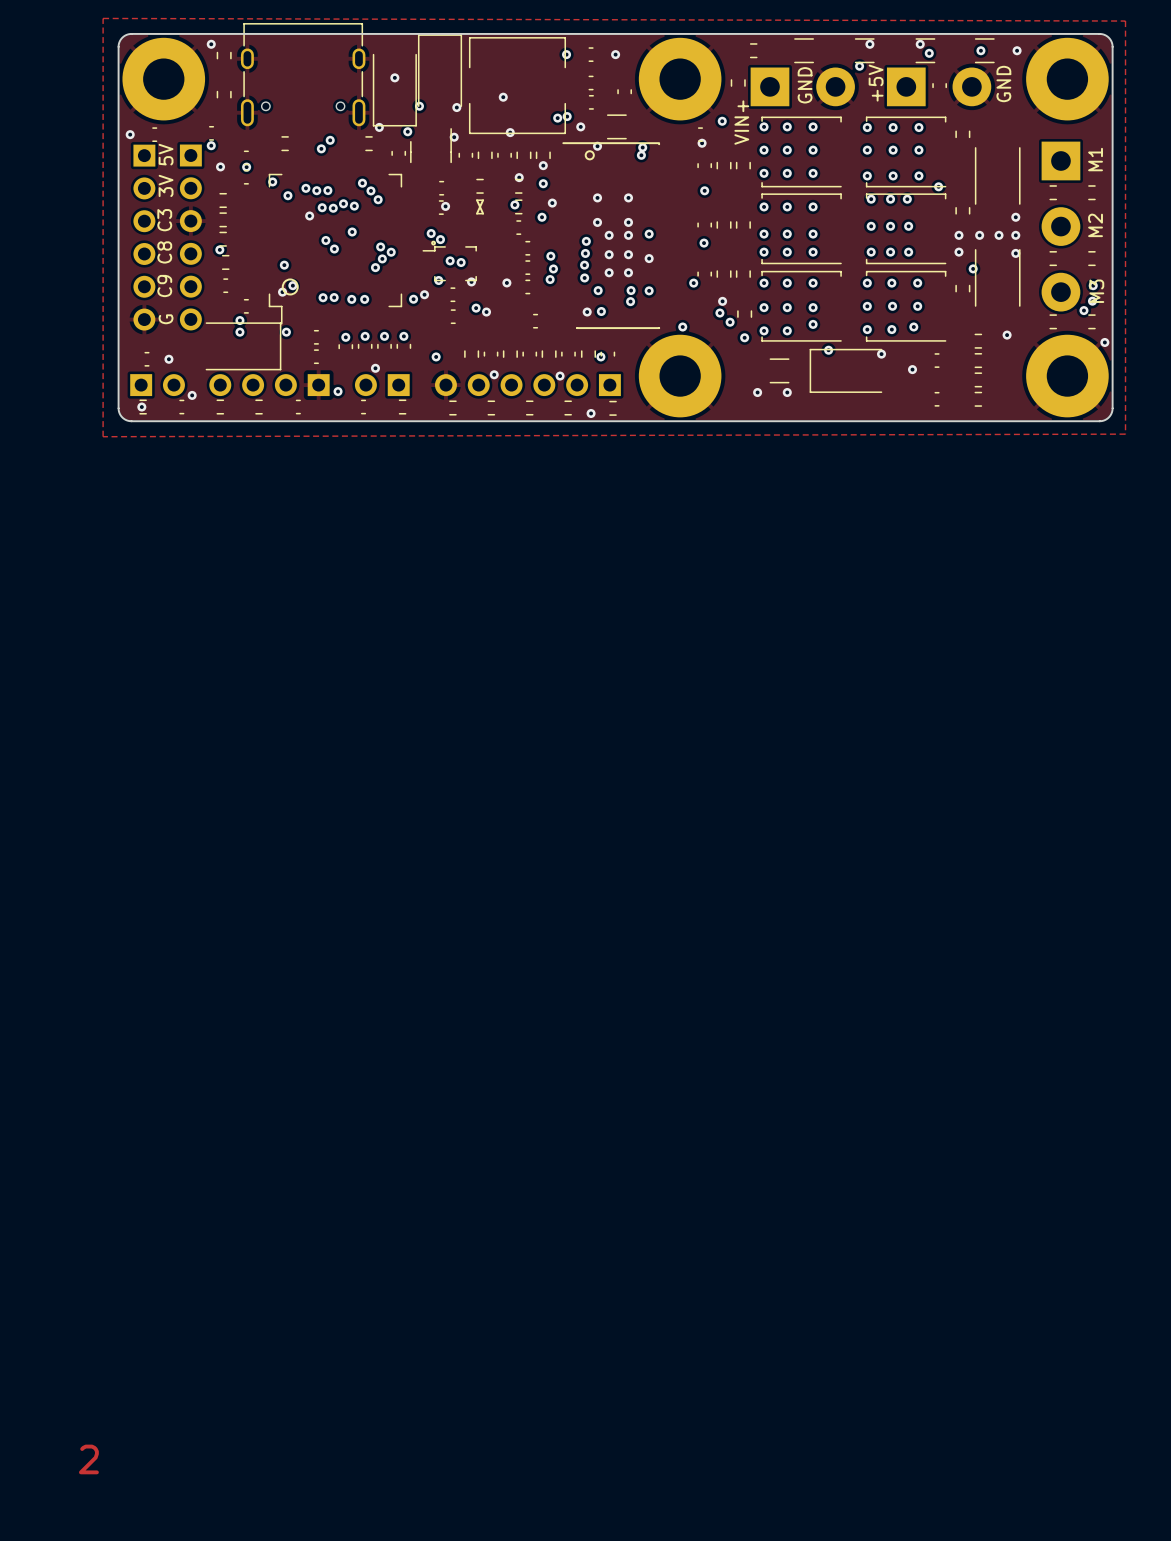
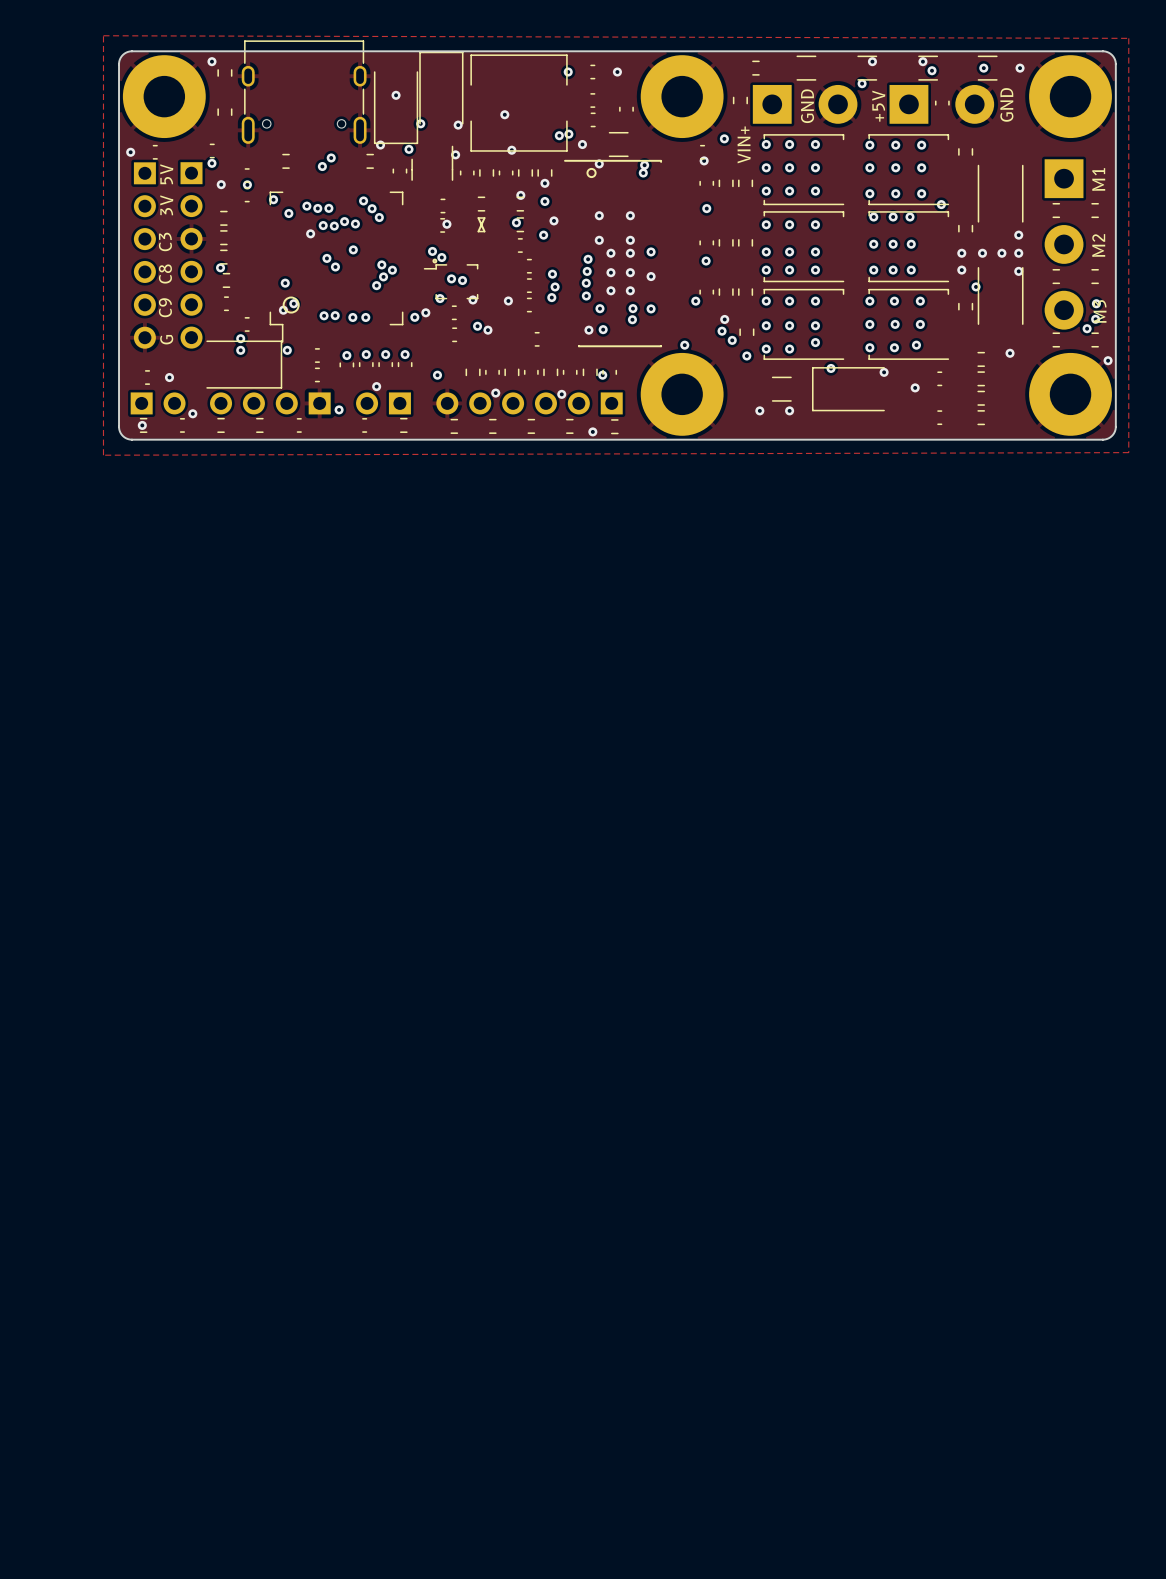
text: 2 (88, 1459) -> none

